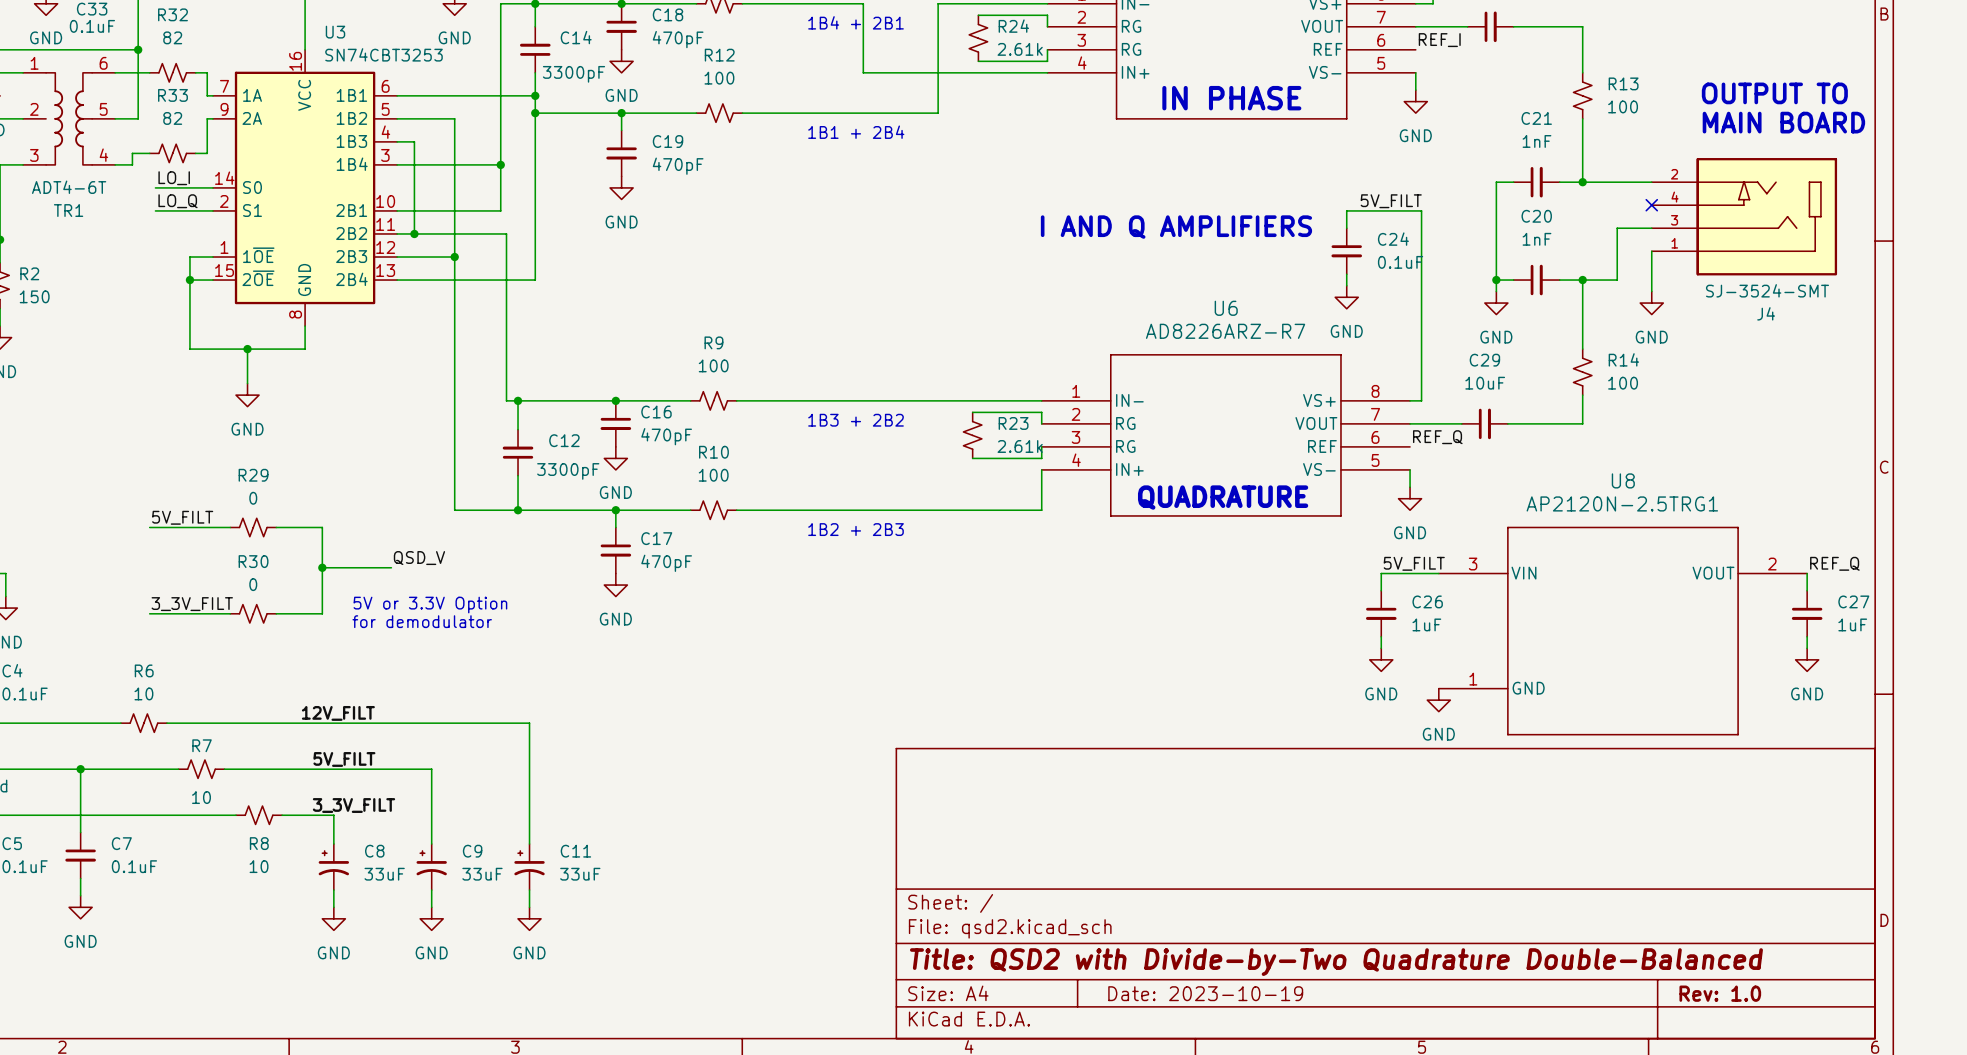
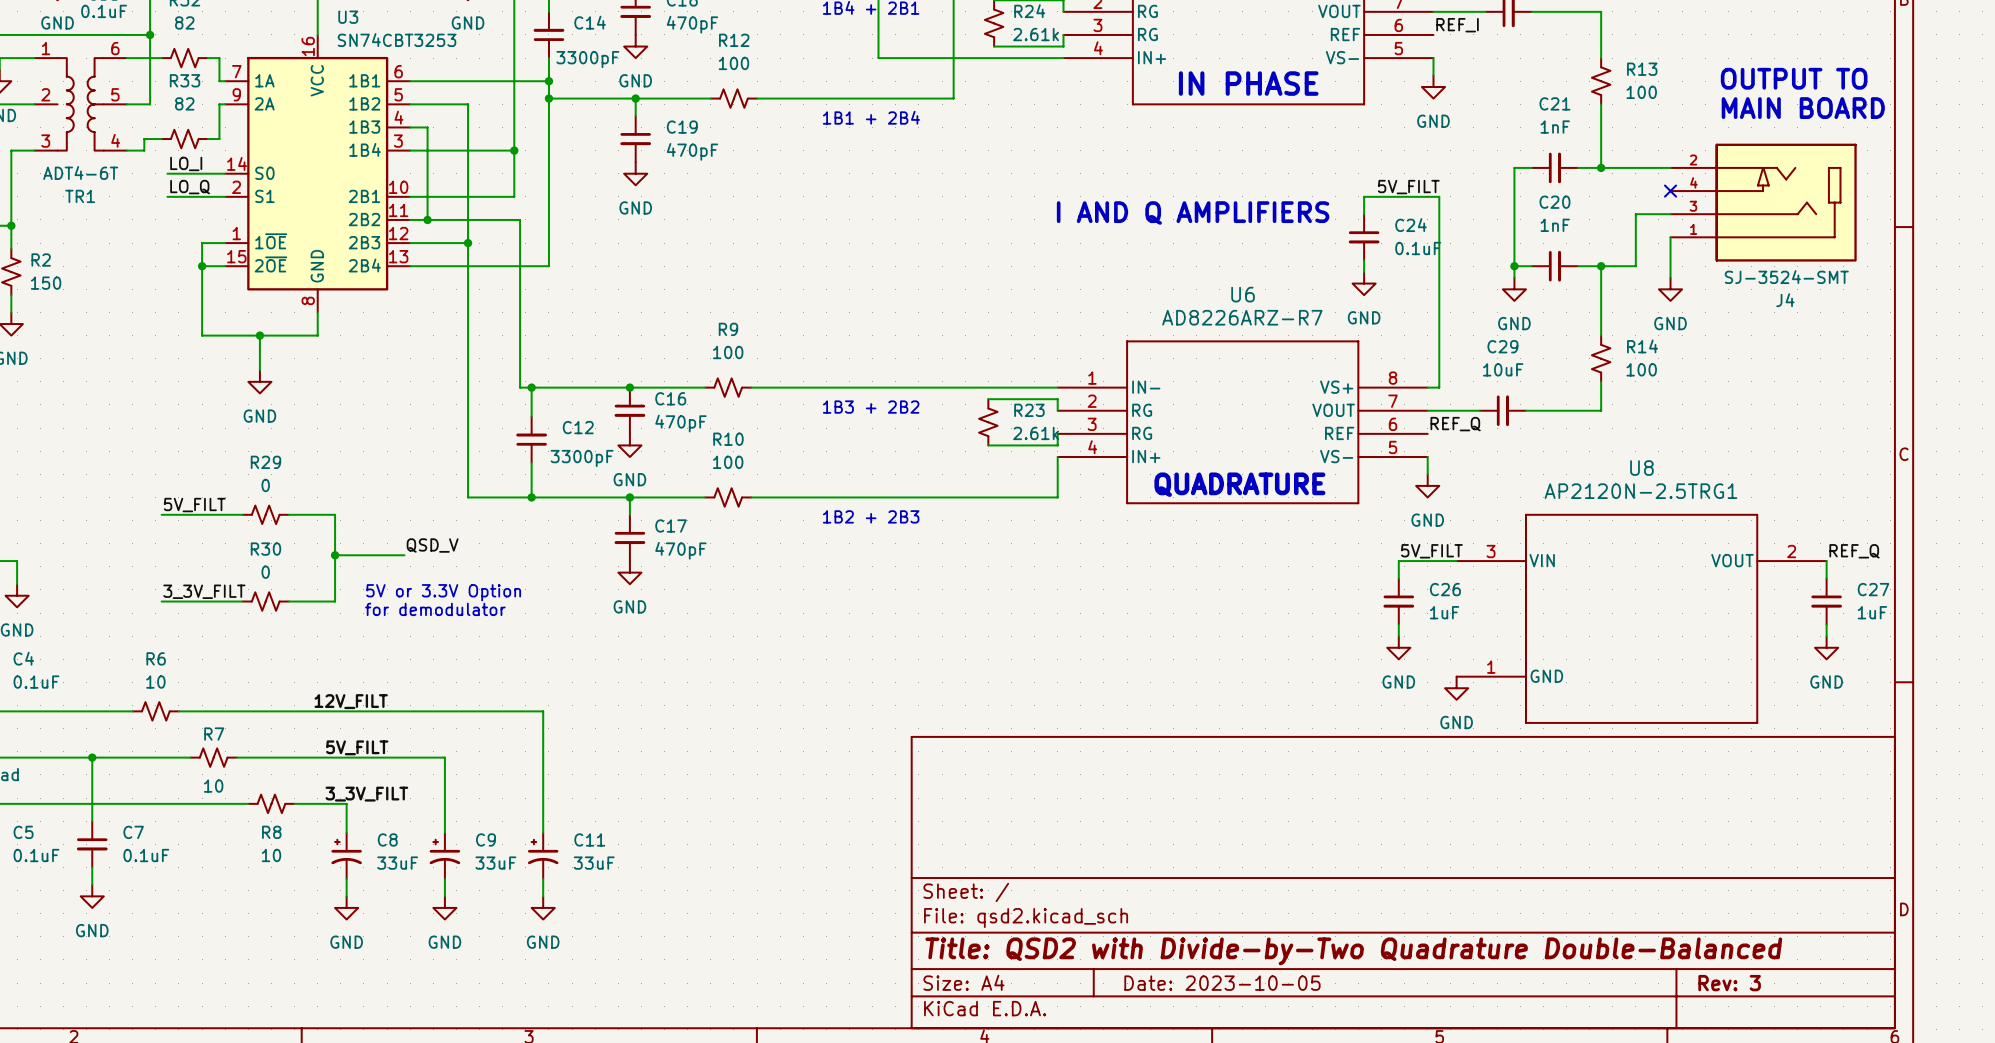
title block: Date: 2023-10-19 (1205, 993) -> Date: 2023-10-05 (1222, 983)
title block: Rev: 1.0 (1720, 993) -> Rev: 3 (1729, 983)

